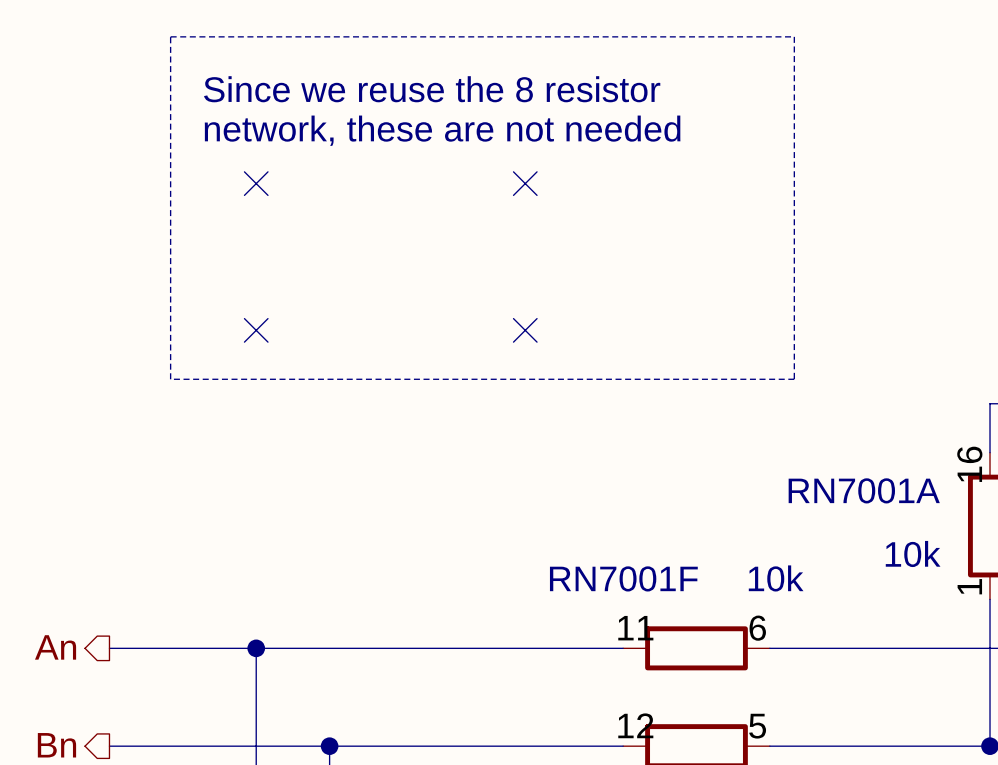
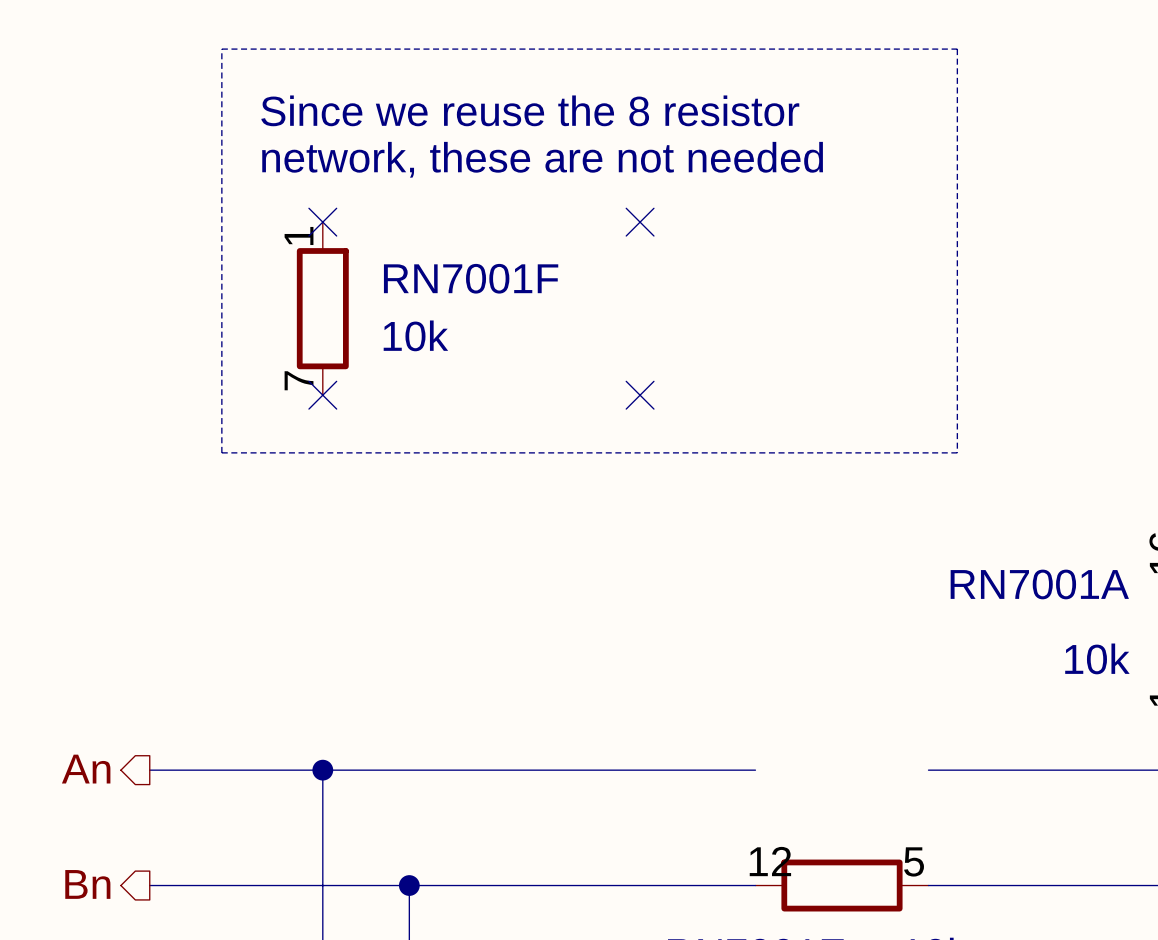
RN7001F name position: RN7001F (623, 578) -> RN7001F (471, 278)
RN7001F value position: 10k (776, 578) -> 10k (415, 335)
RN7001F symbol: [623, 626, 770, 671] -> [296, 222, 349, 396]

